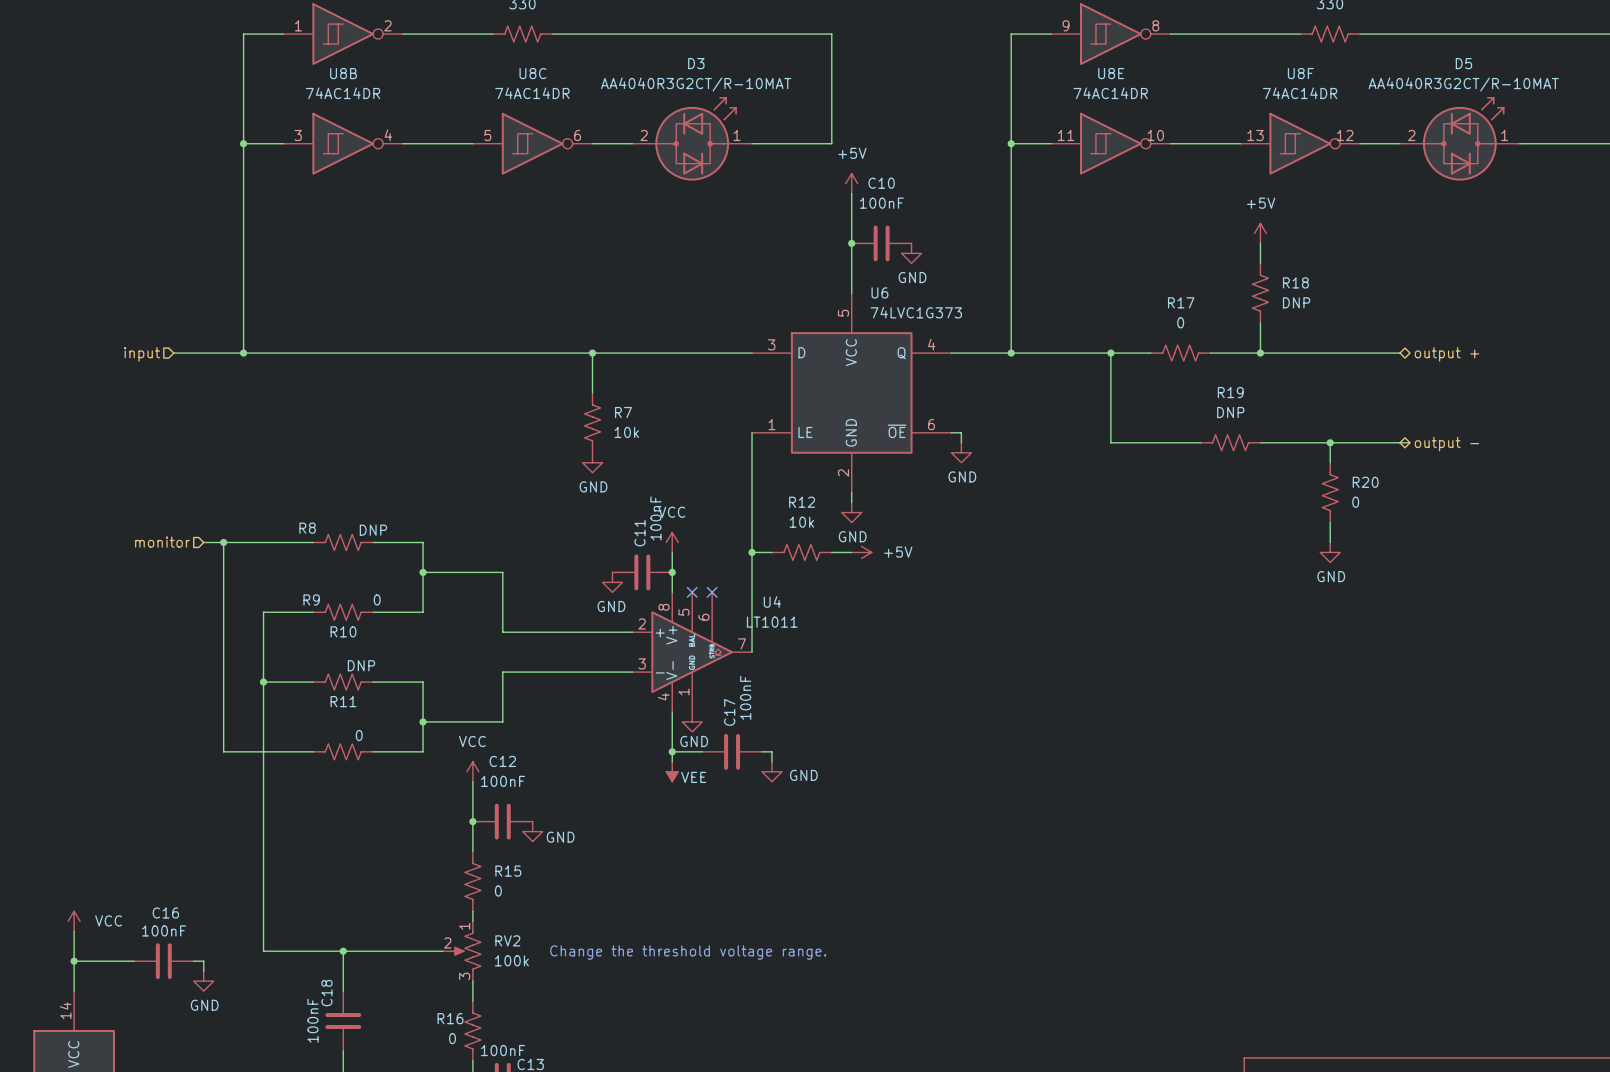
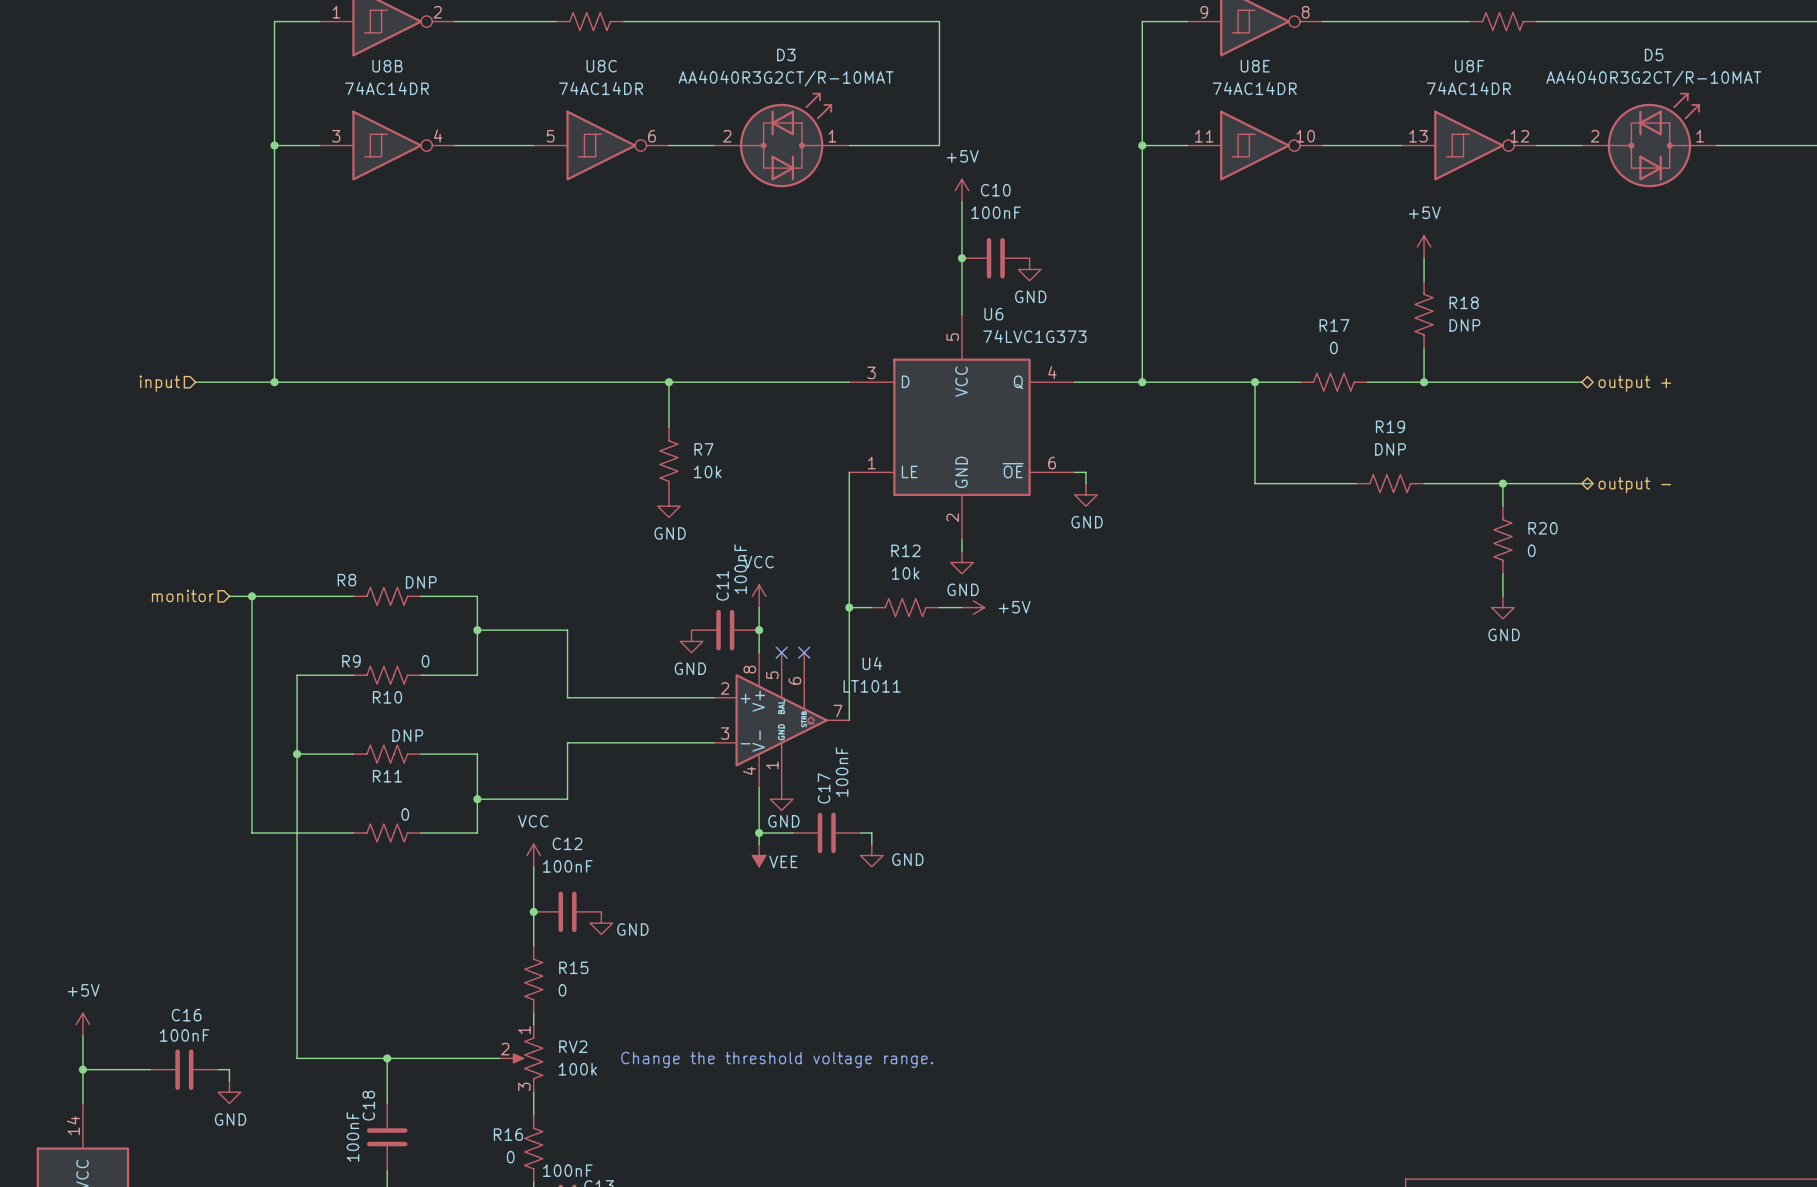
power symbol: VCC (74, 921) -> +5V (82, 1024)

